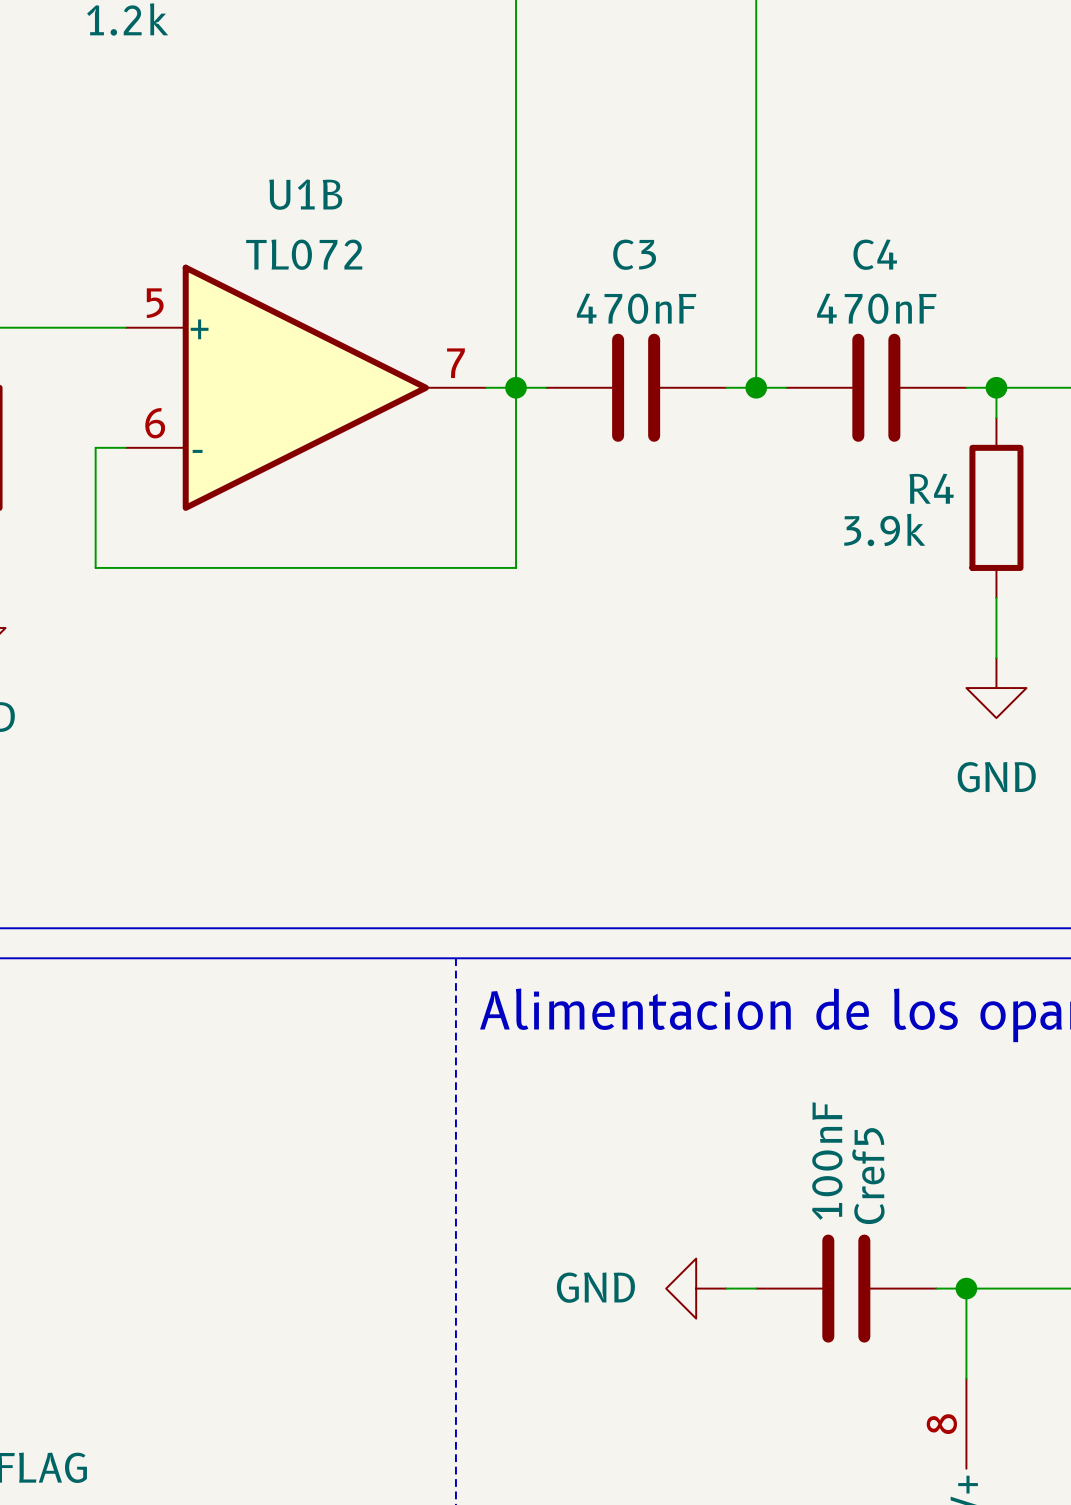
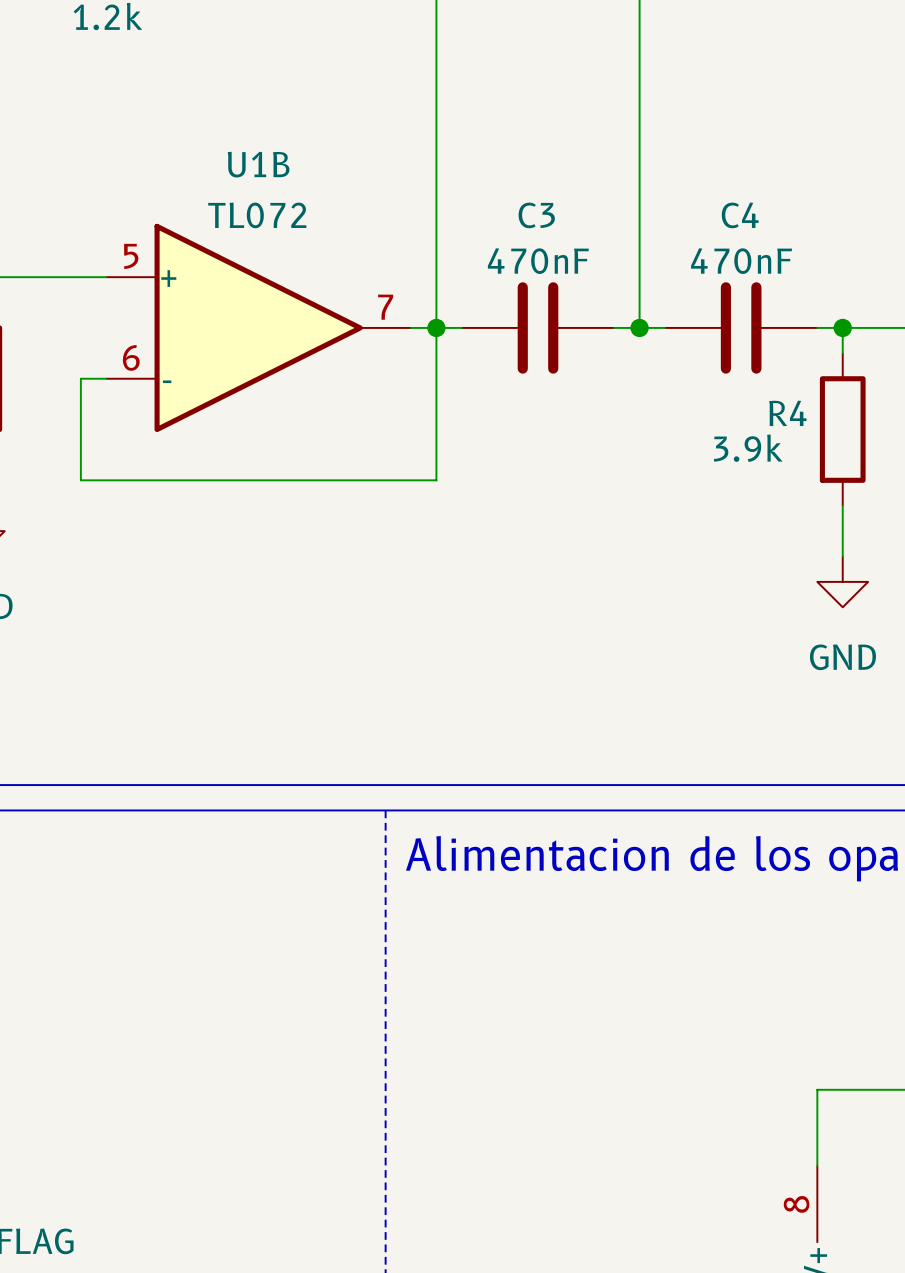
power symbol: GND (696, 1288) -> none
wire: (726, 1288) (756, 1288) -> none
Cref5: 100nF (846, 1288) -> none
wire: (936, 1288) (966, 1288) -> none
junction: (966, 1288) -> none

